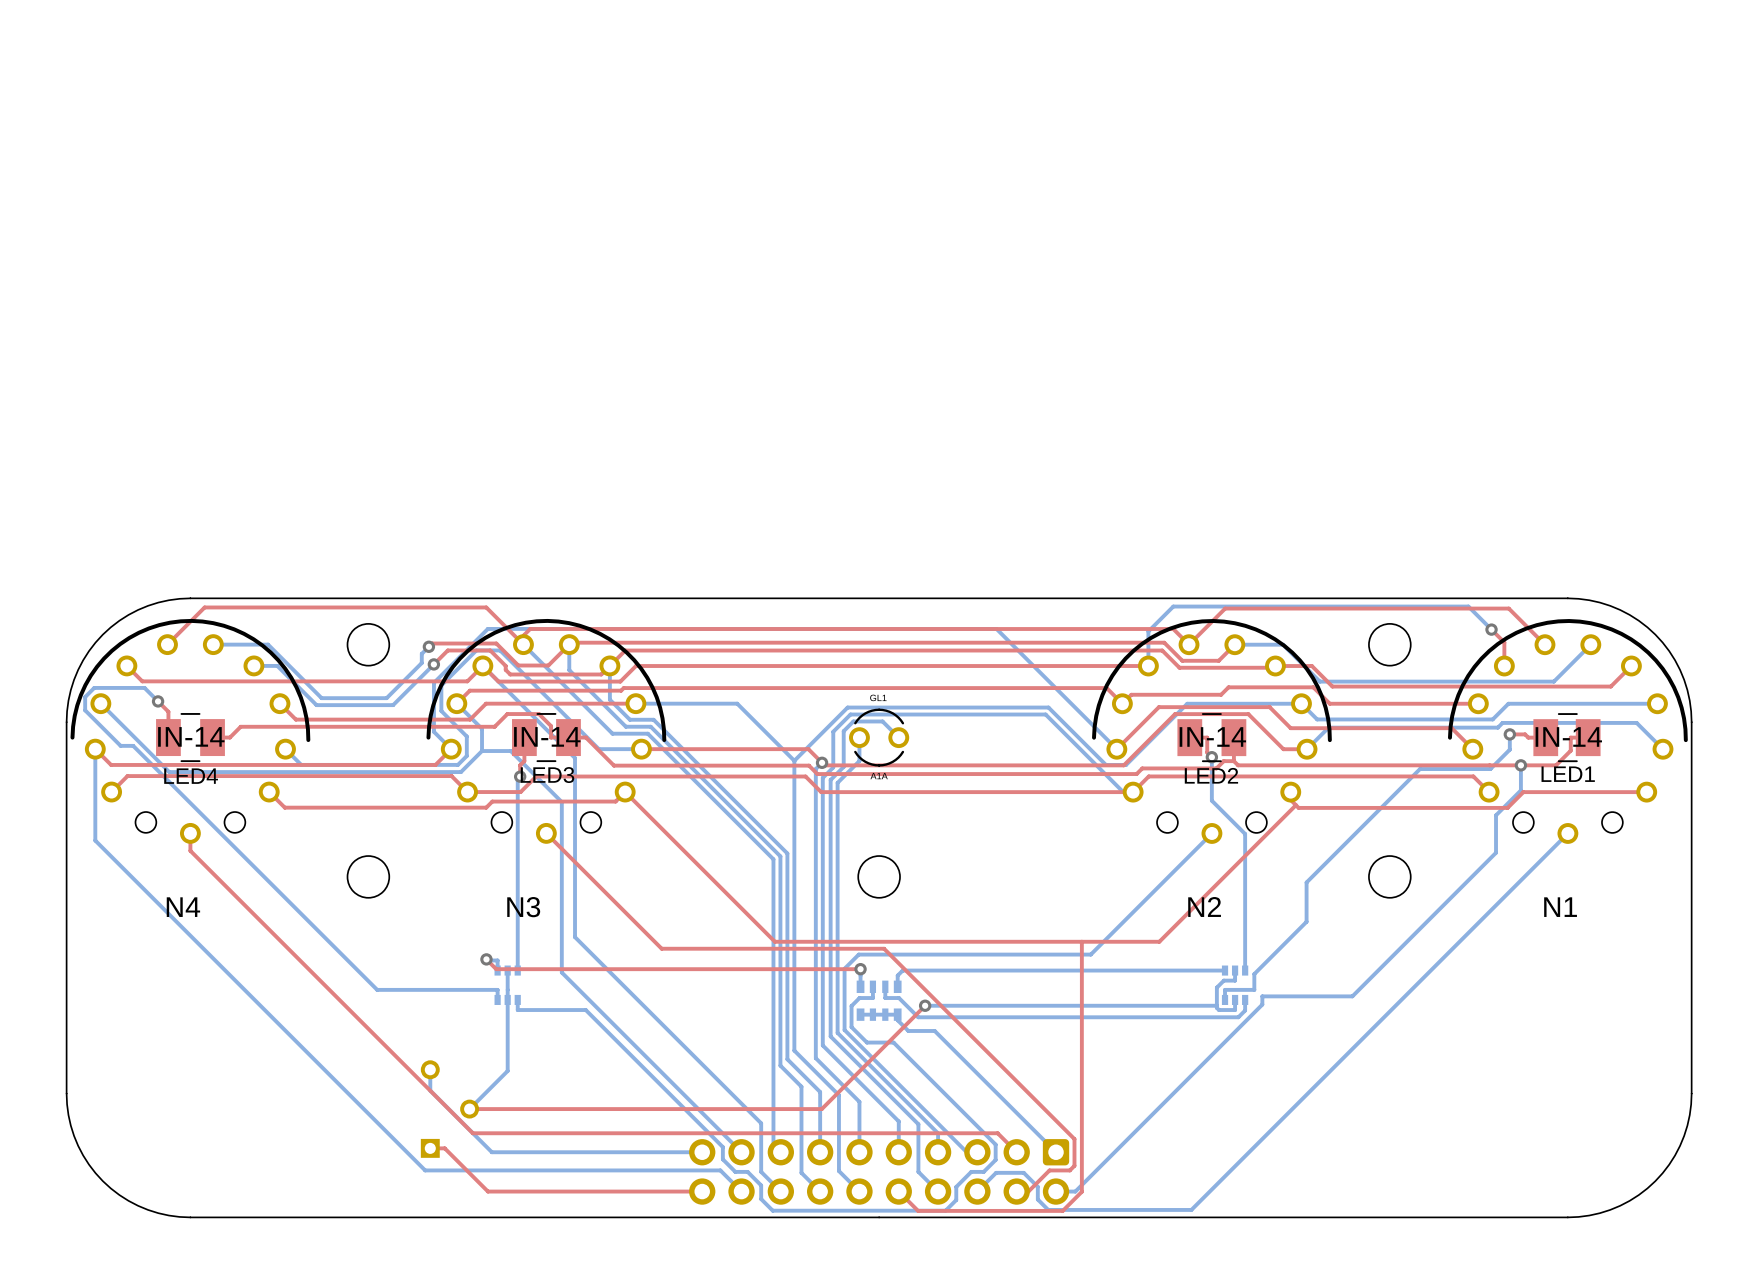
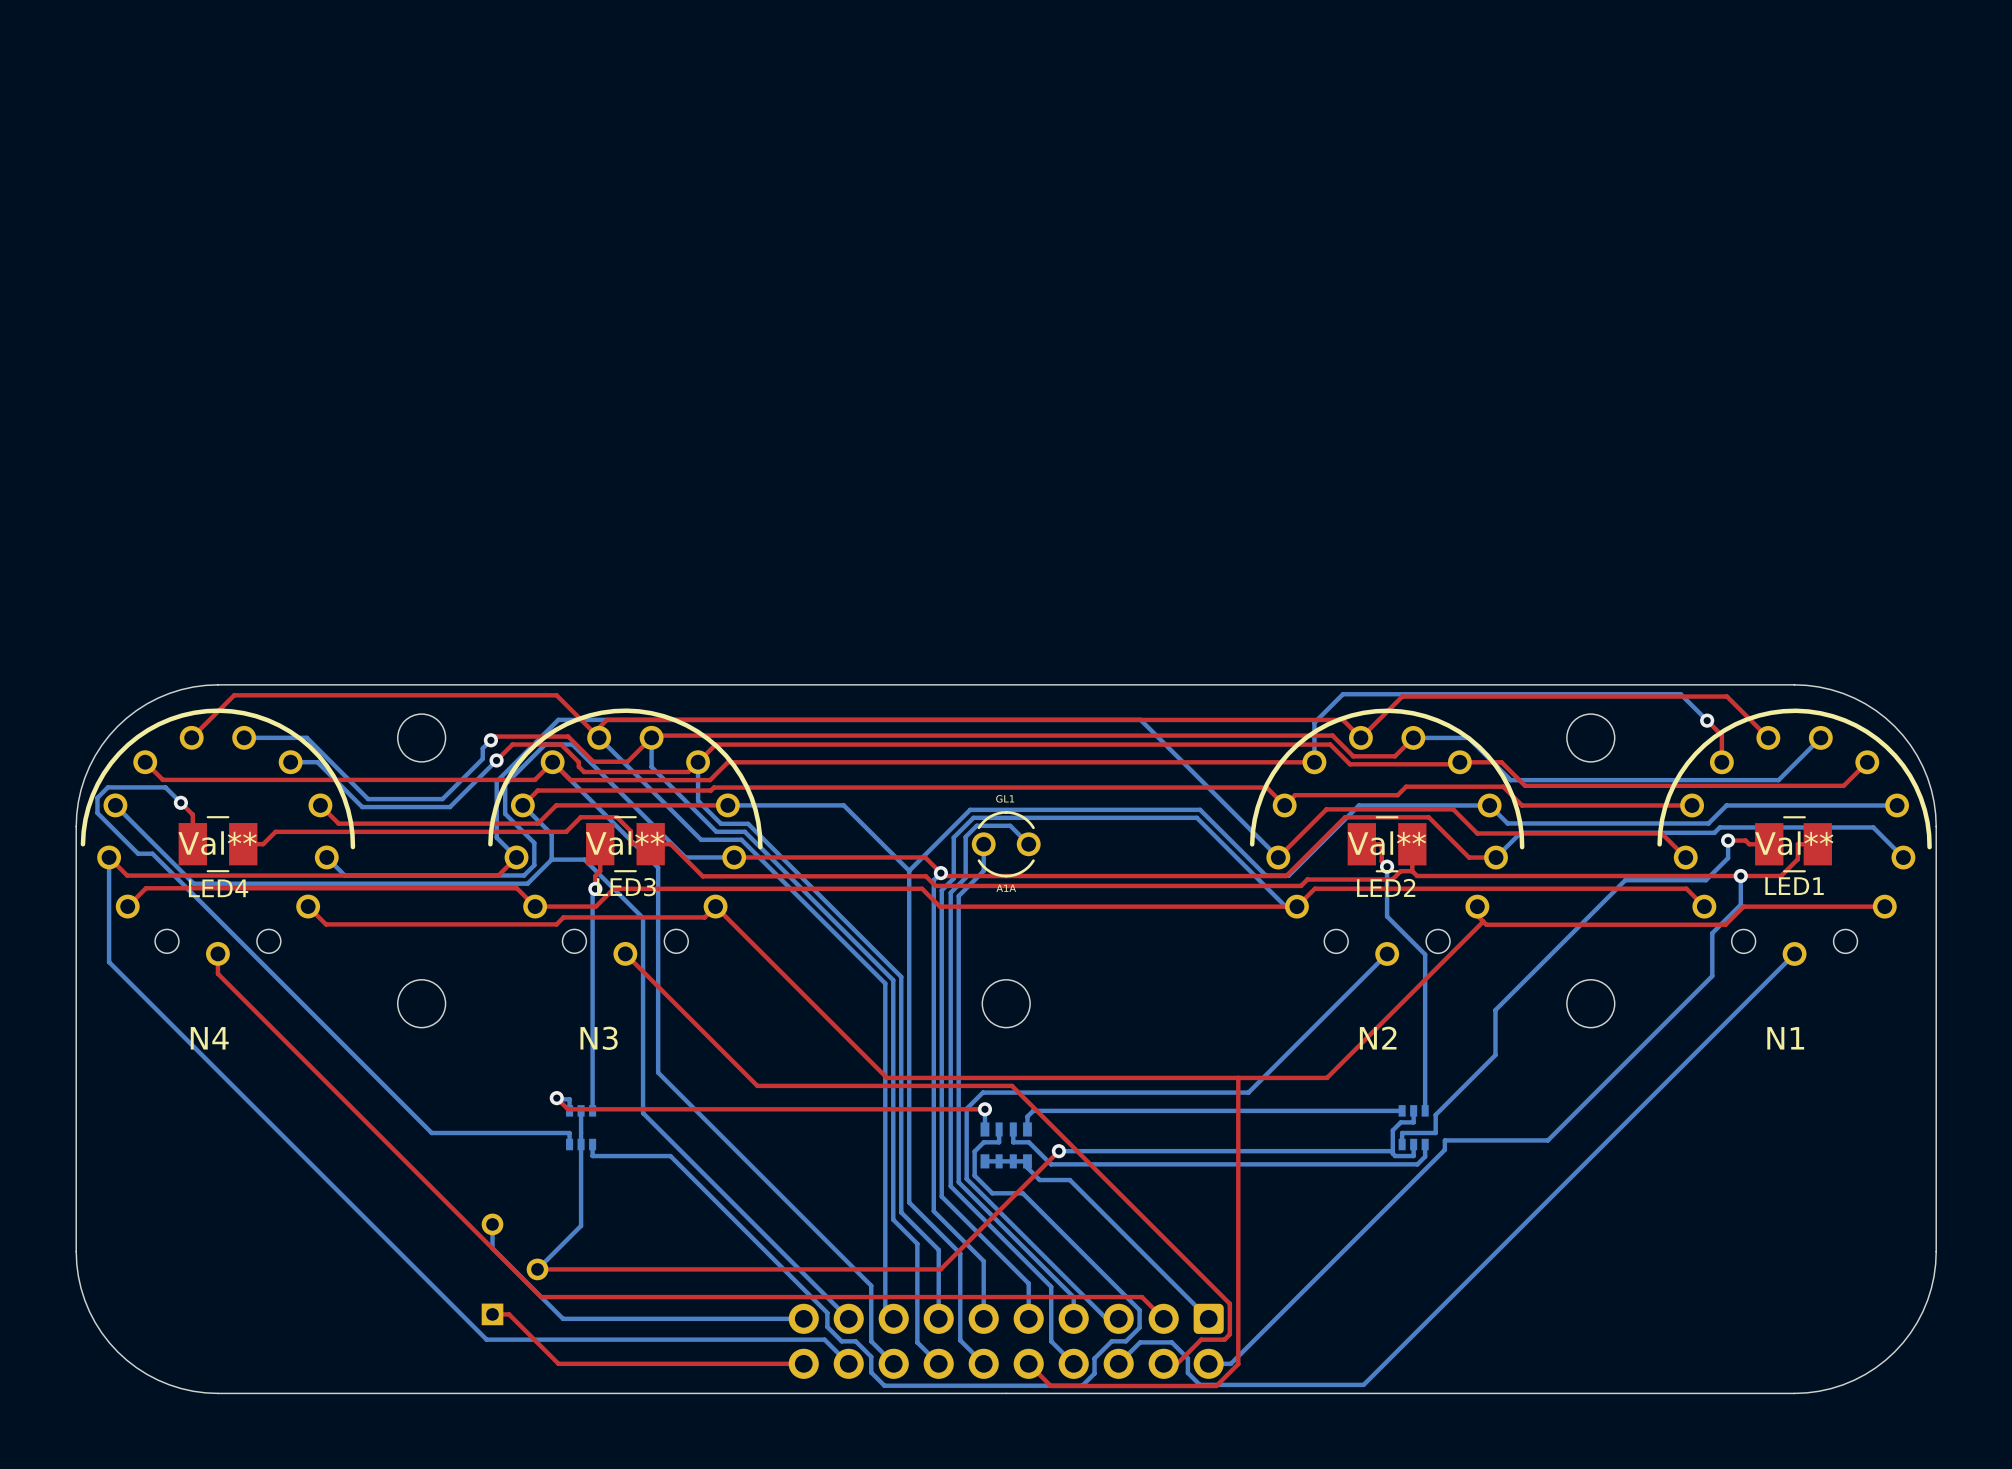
N4 value: IN-14 (191, 736) -> Val** (217, 843)
N3 value: IN-14 (547, 736) -> Val** (625, 843)
N2 value: IN-14 (1212, 736) -> Val** (1386, 843)
N1 value: IN-14 (1568, 736) -> Val** (1794, 843)

